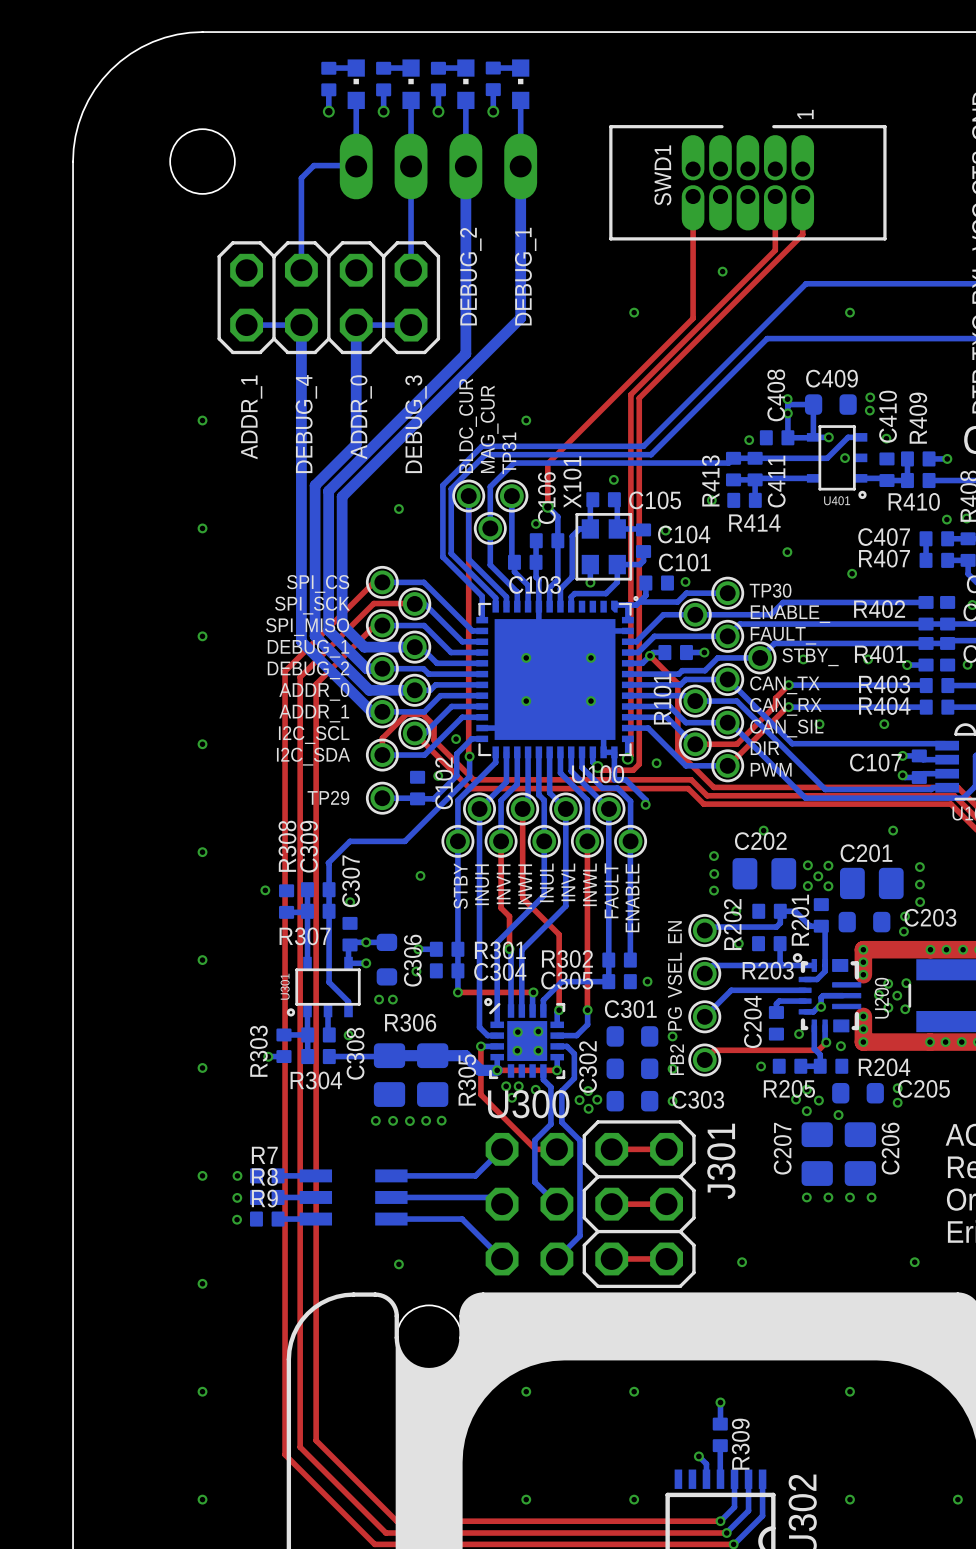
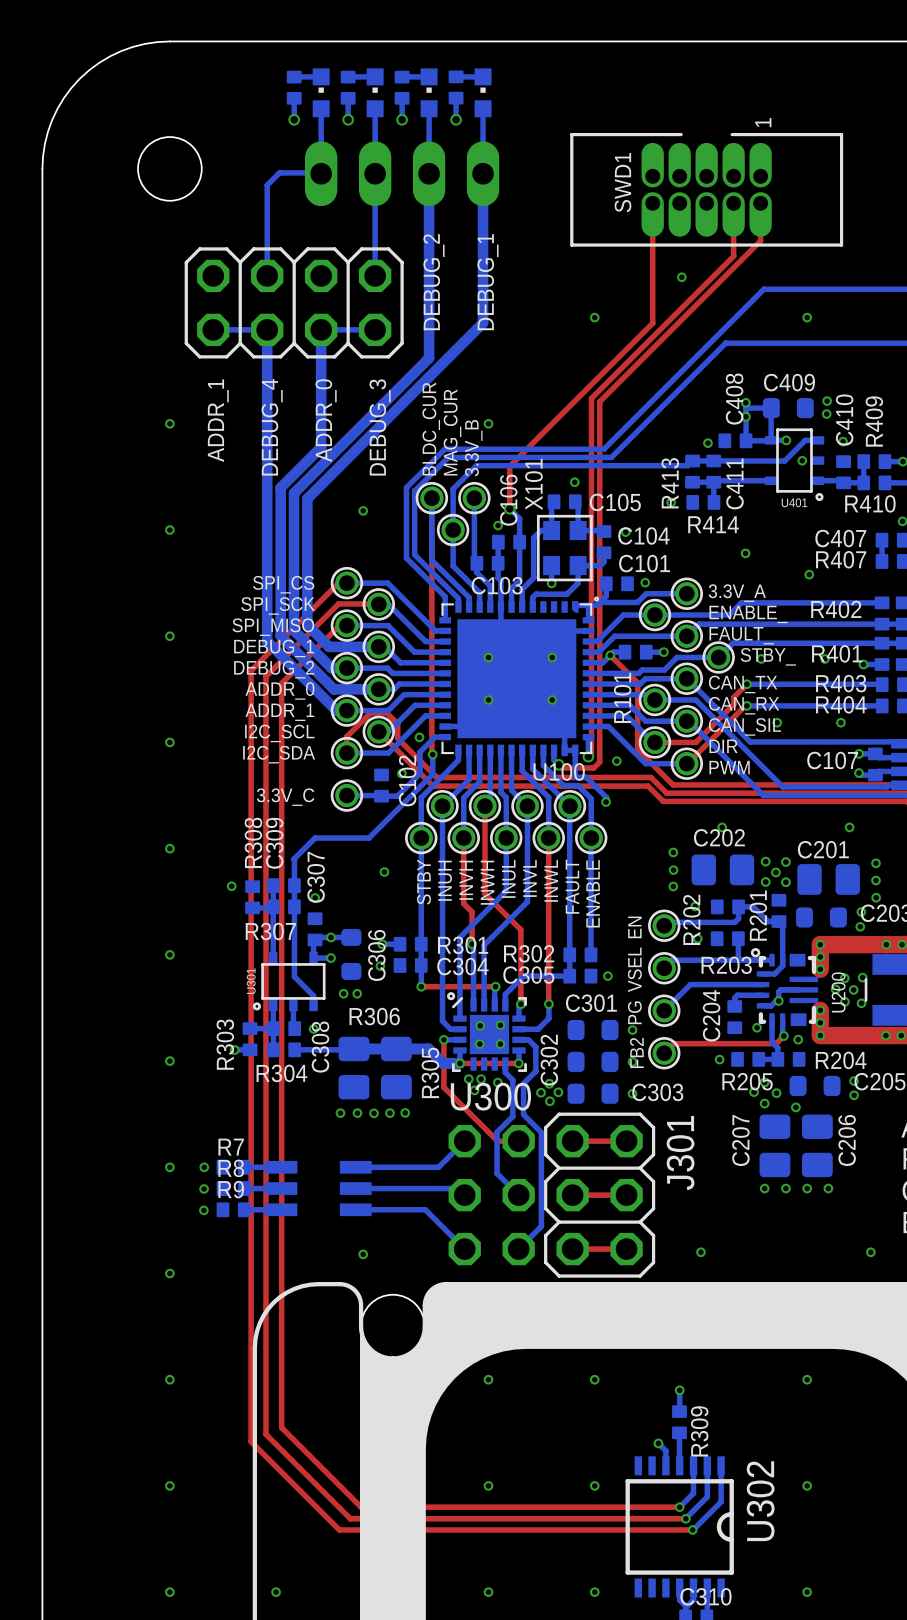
TP31 name: TP31 (509, 453) -> 3.3V_B (473, 448)
TP30 name: TP30 (770, 590) -> 3.3V_A (737, 593)
TP29 name: TP29 (328, 797) -> 3.3V_C (285, 797)

